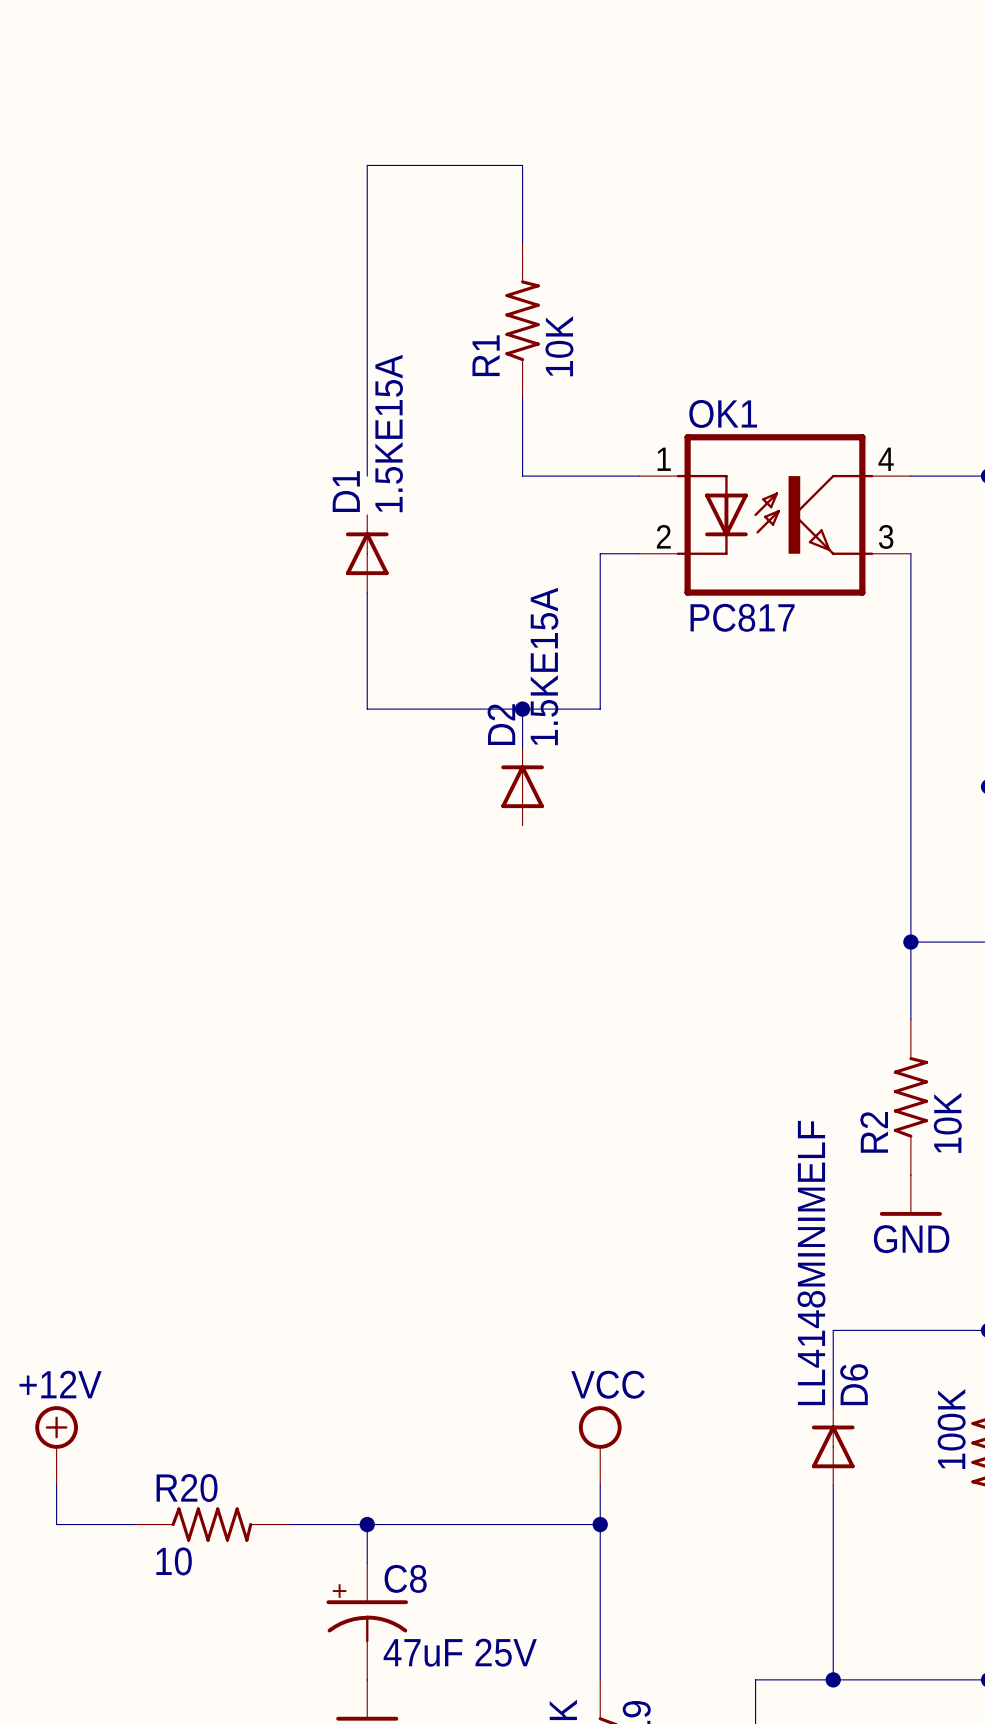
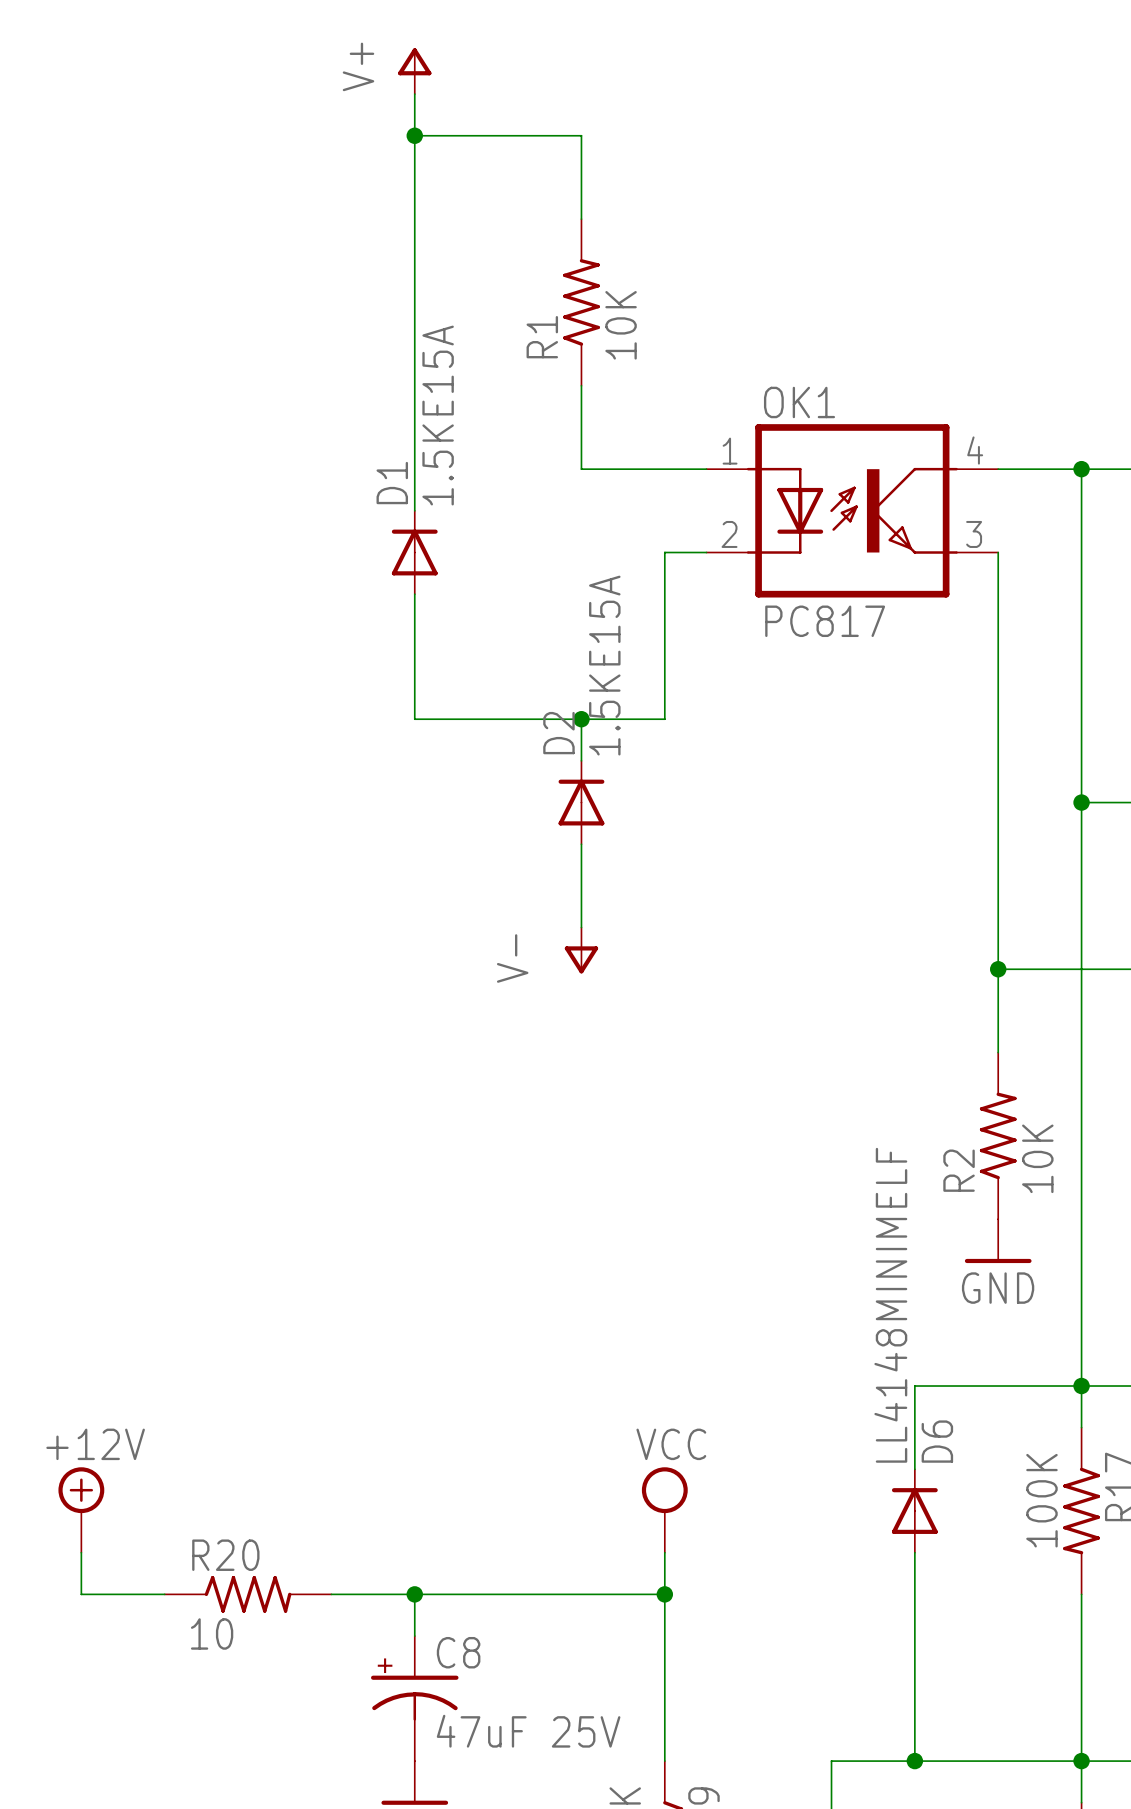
power symbol: none -> V+ (414, 71)
wire: none -> (414, 94) (414, 135)
junction: none -> (414, 135)
wire: none -> (414, 469) (414, 510)
wire: none -> (581, 844) (581, 927)
power symbol: none -> V- (581, 950)

